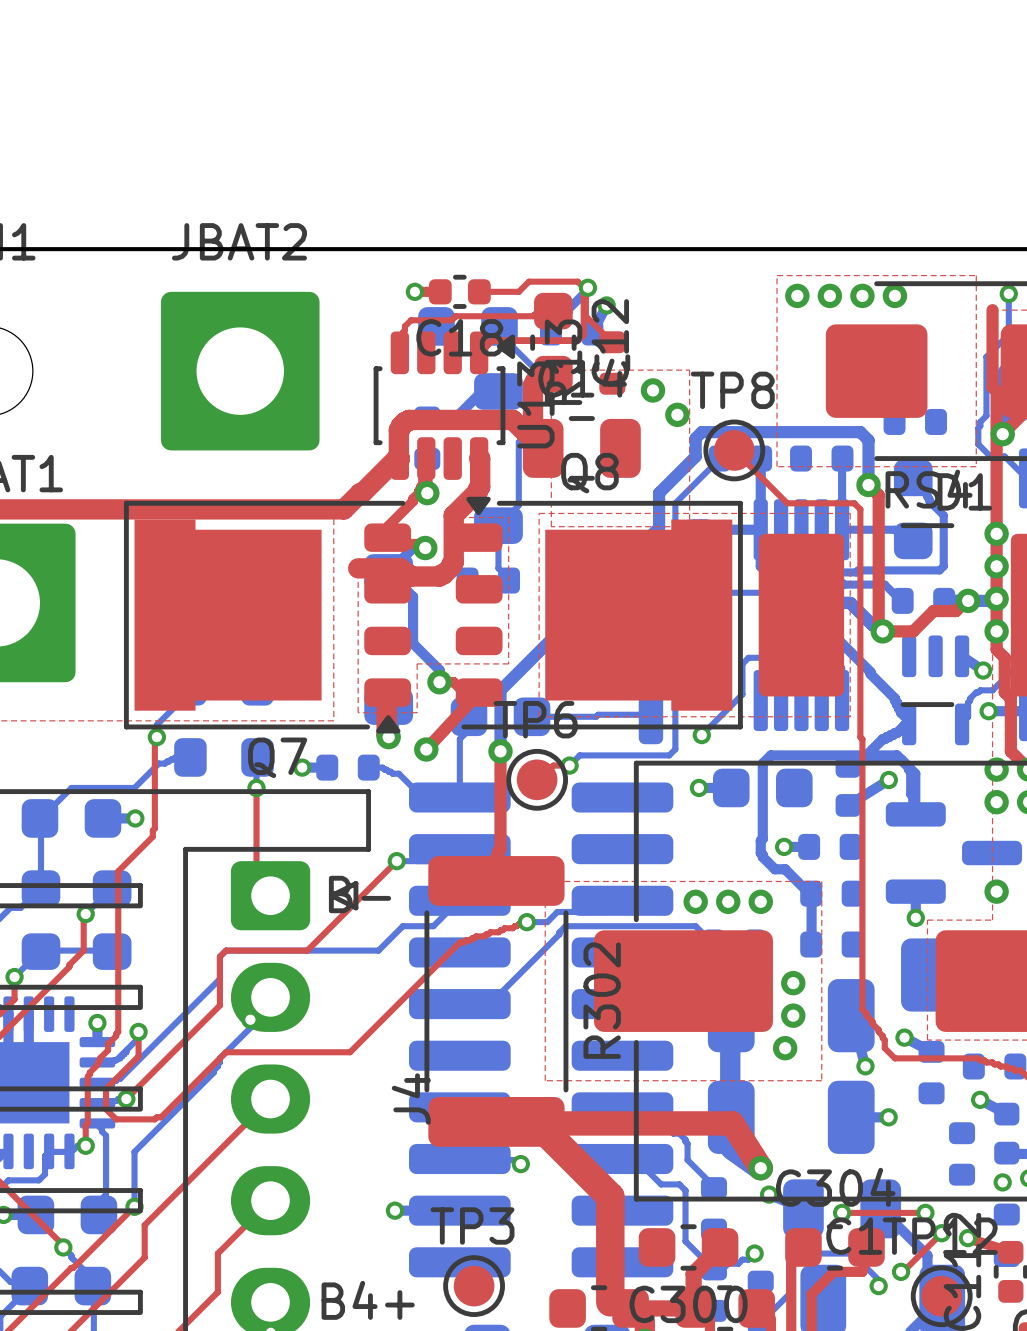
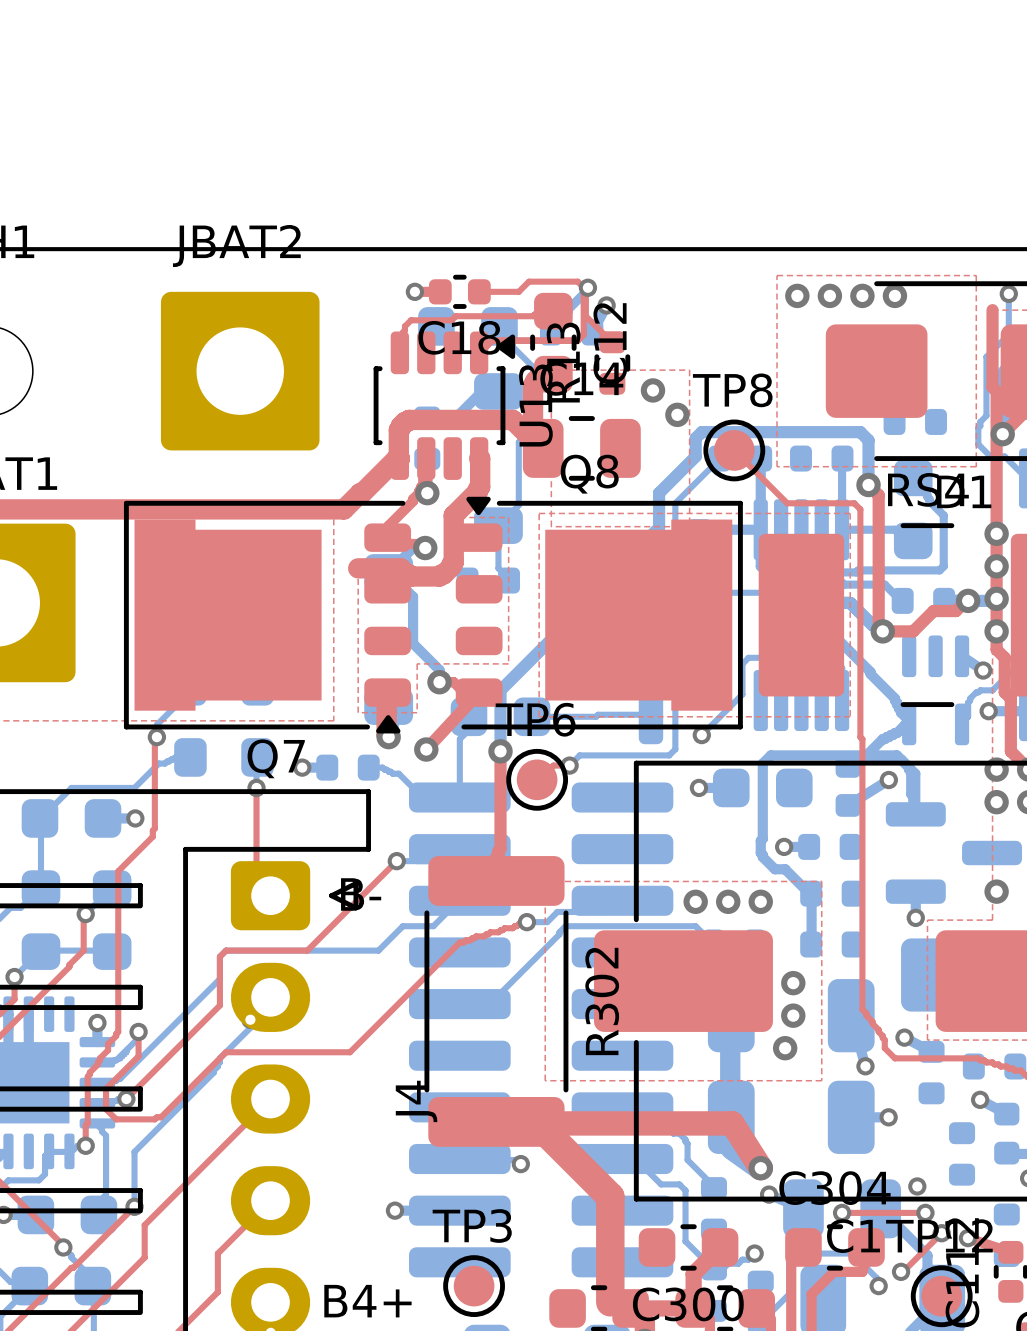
via position: (1002, 1182) -> (917, 1186)

